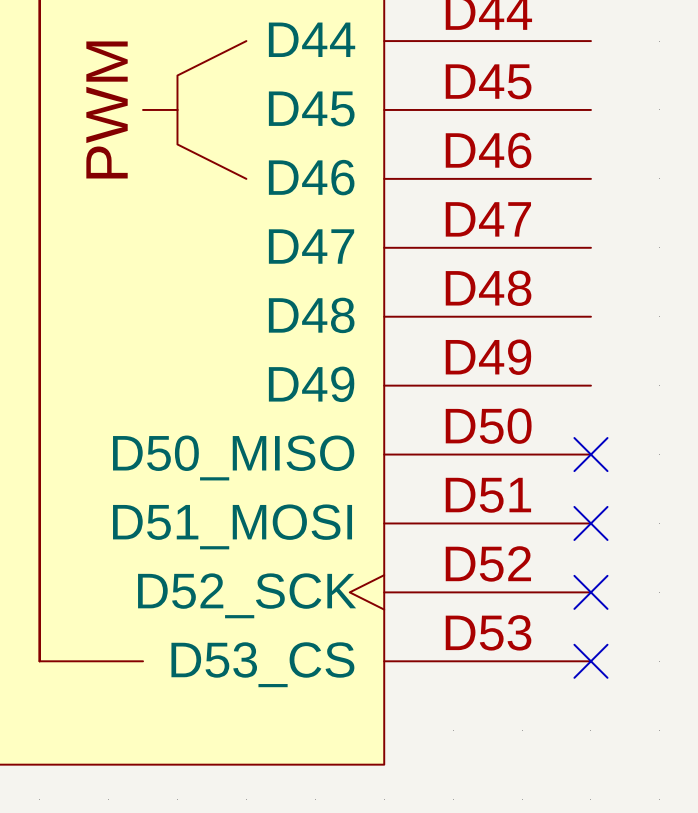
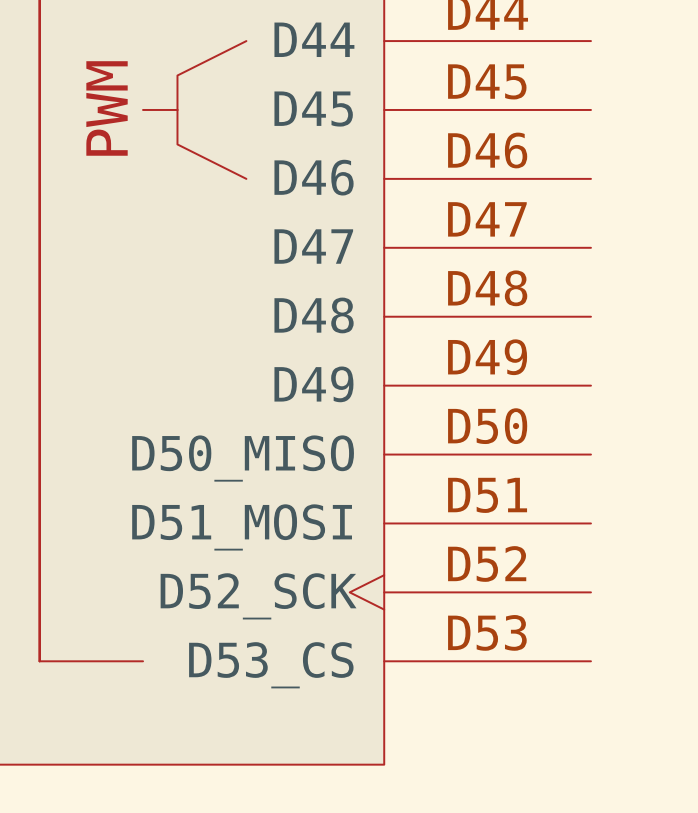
no-connect mark: (590, 454) -> none
no-connect mark: (590, 523) -> none
no-connect mark: (590, 592) -> none
no-connect mark: (590, 661) -> none

